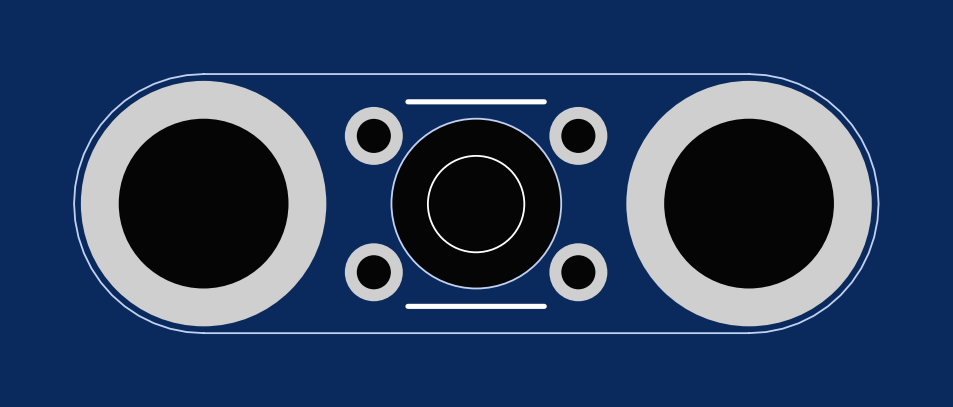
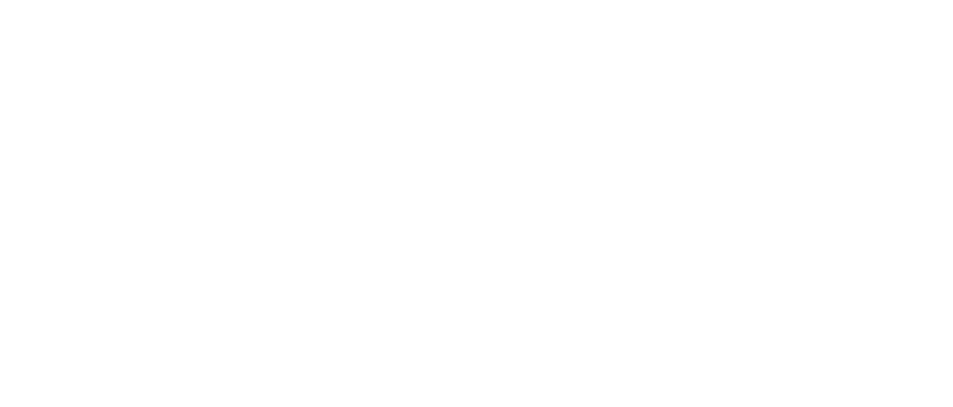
part: (476, 203) -> none

